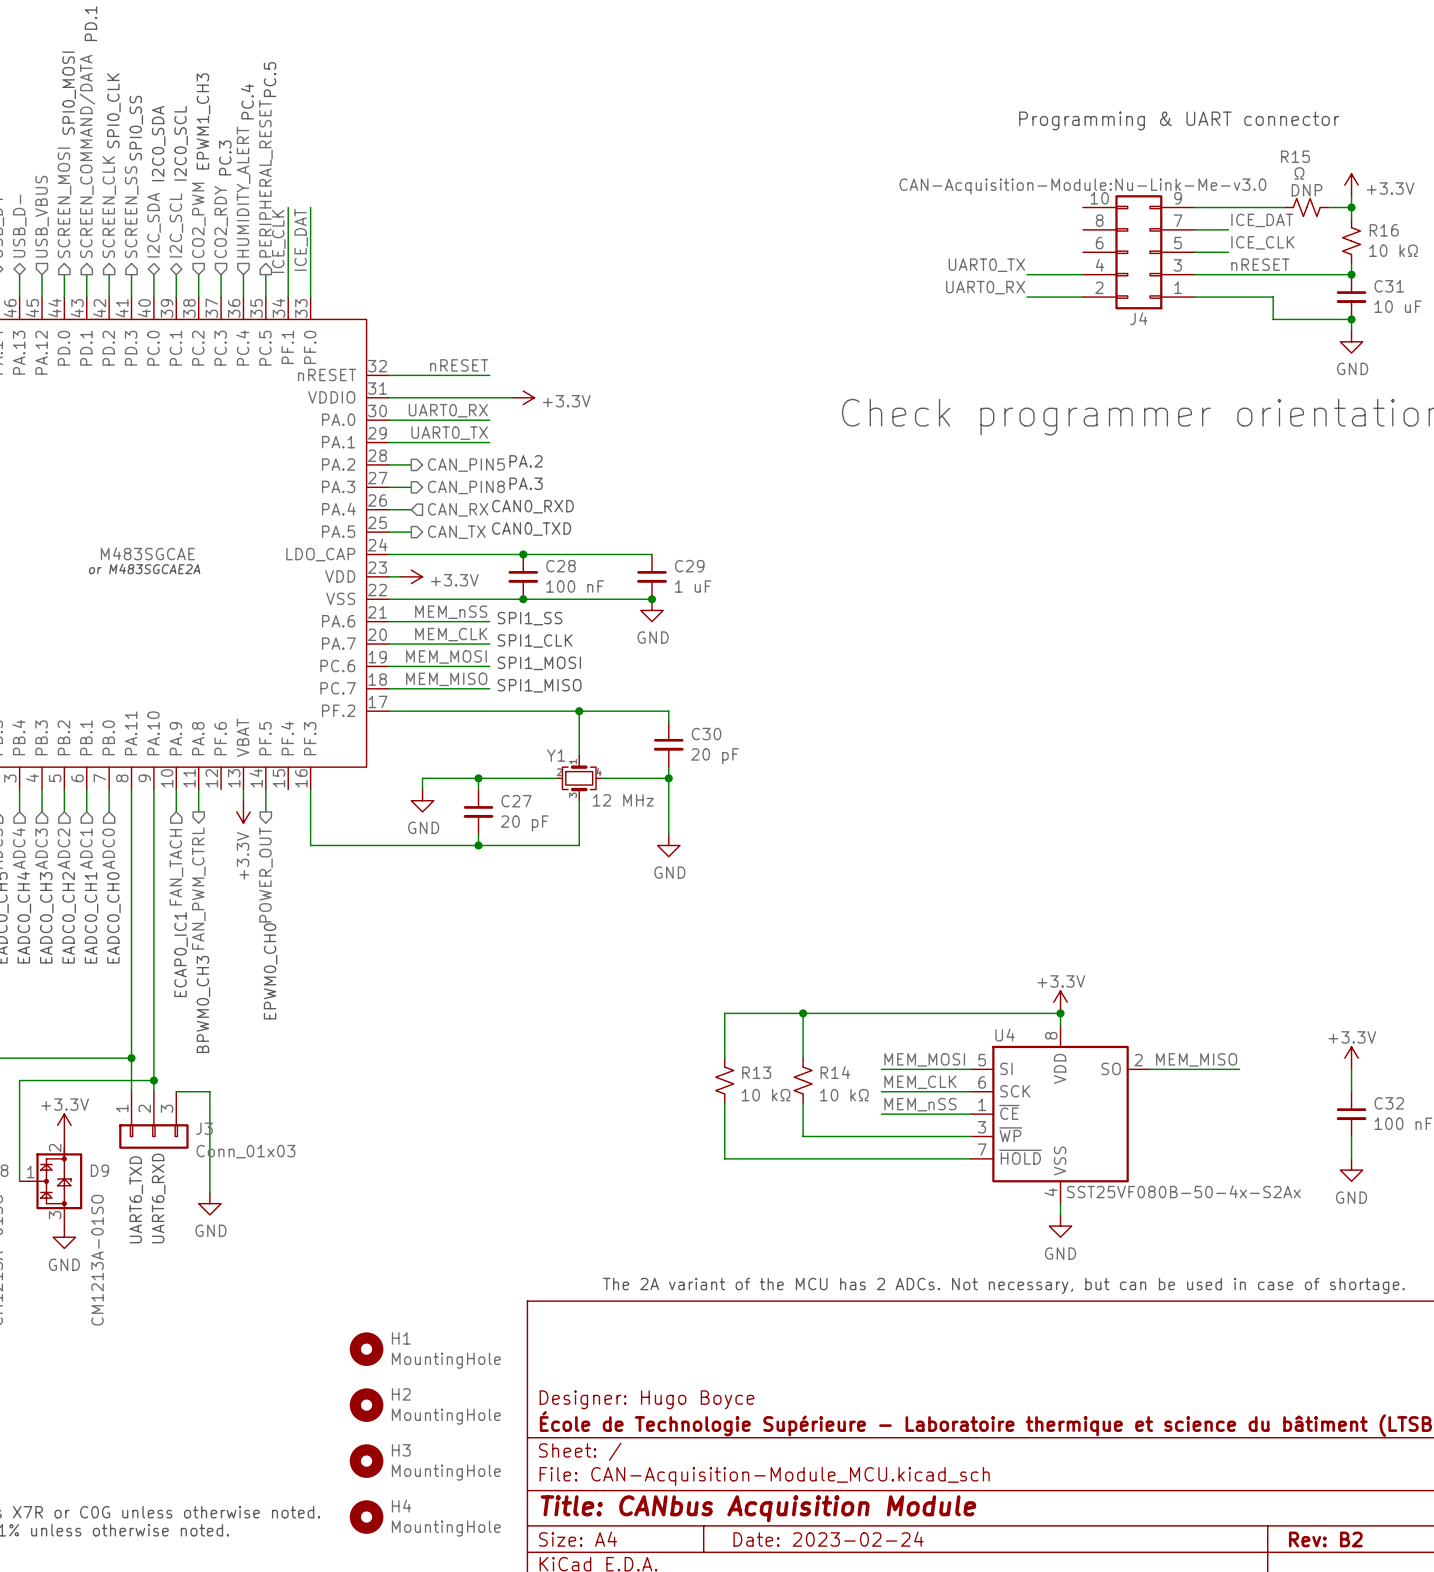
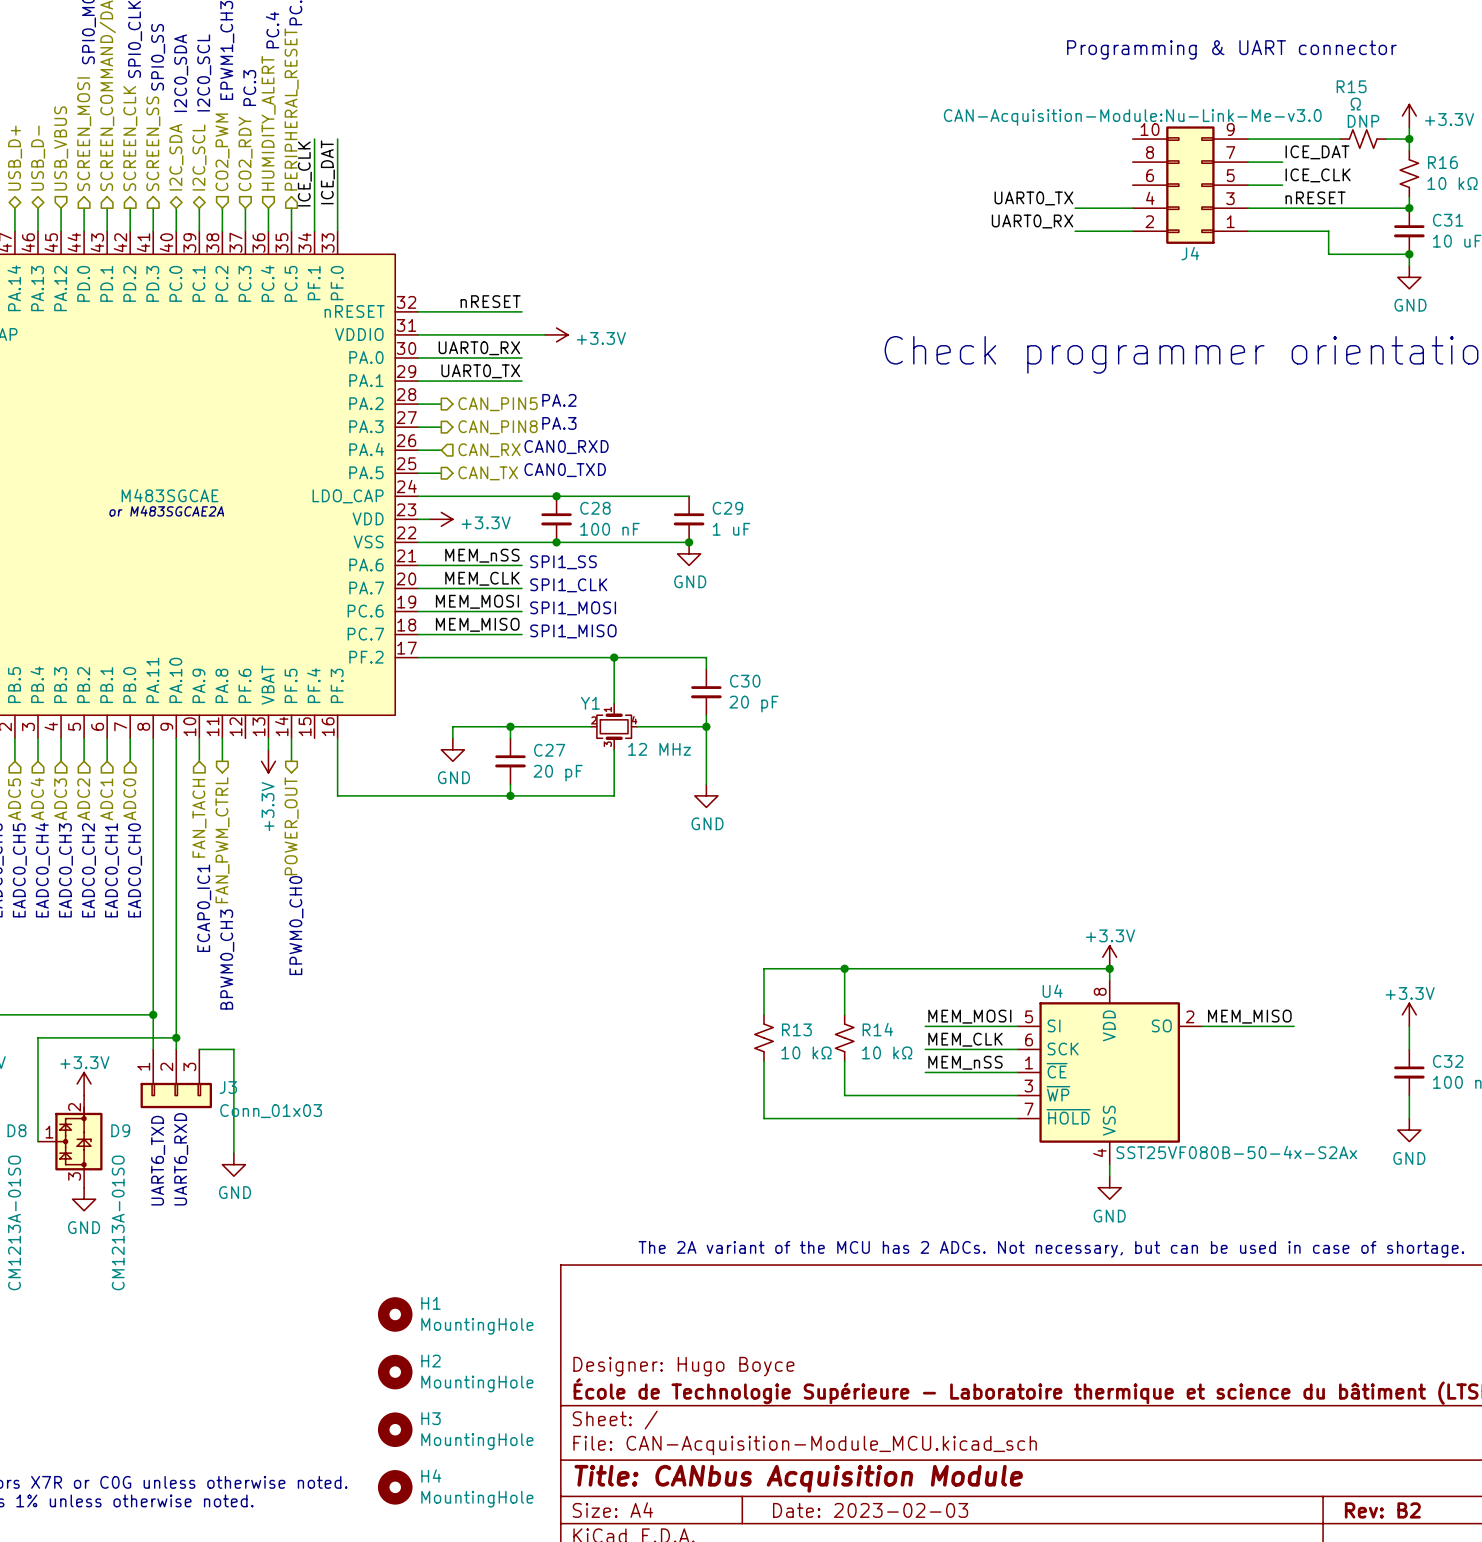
title block: Date: 2023-02-24 (828, 1539) -> Date: 2023-02-03 (870, 1510)

